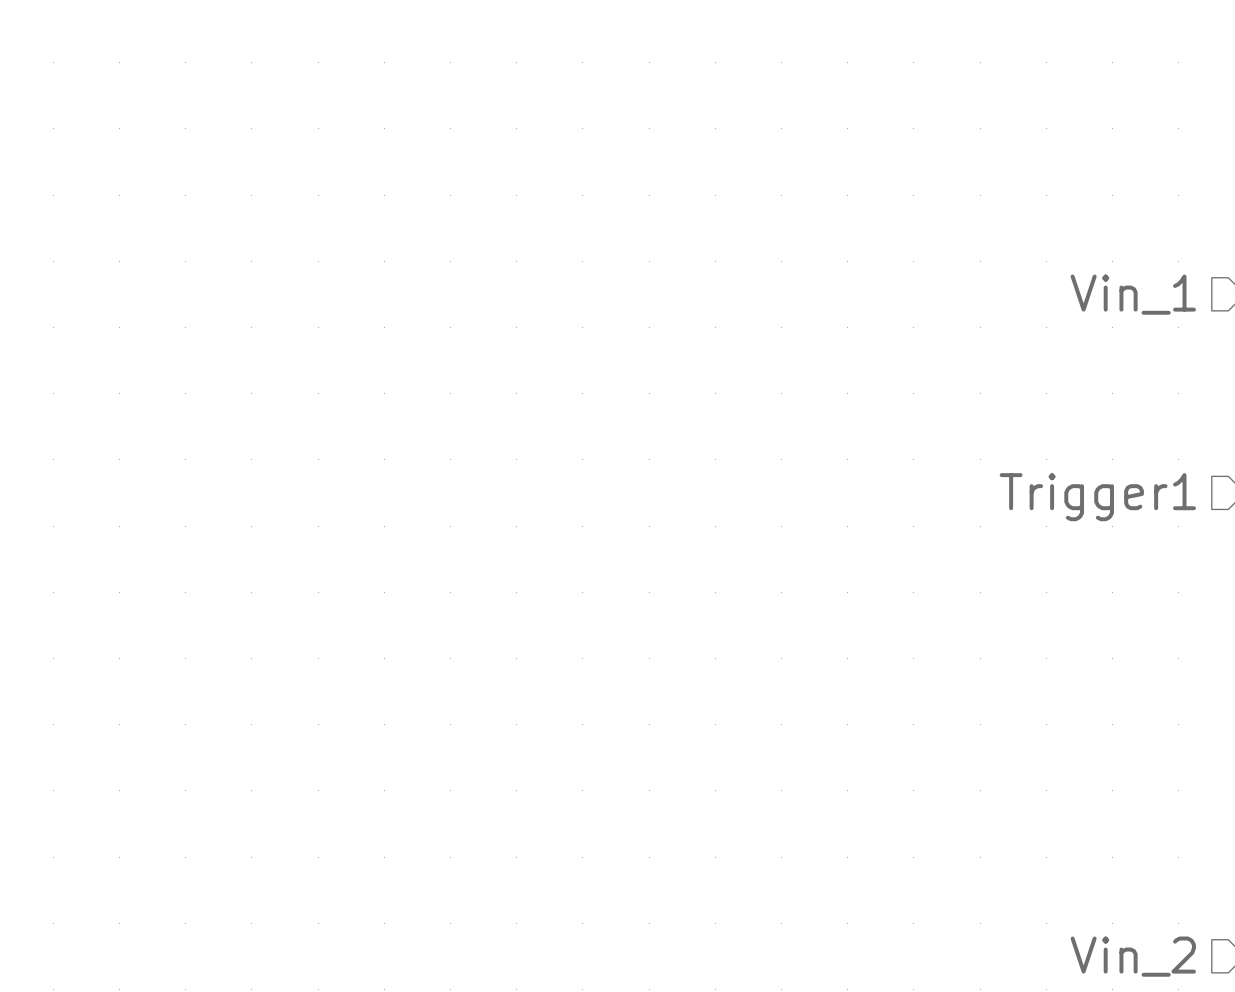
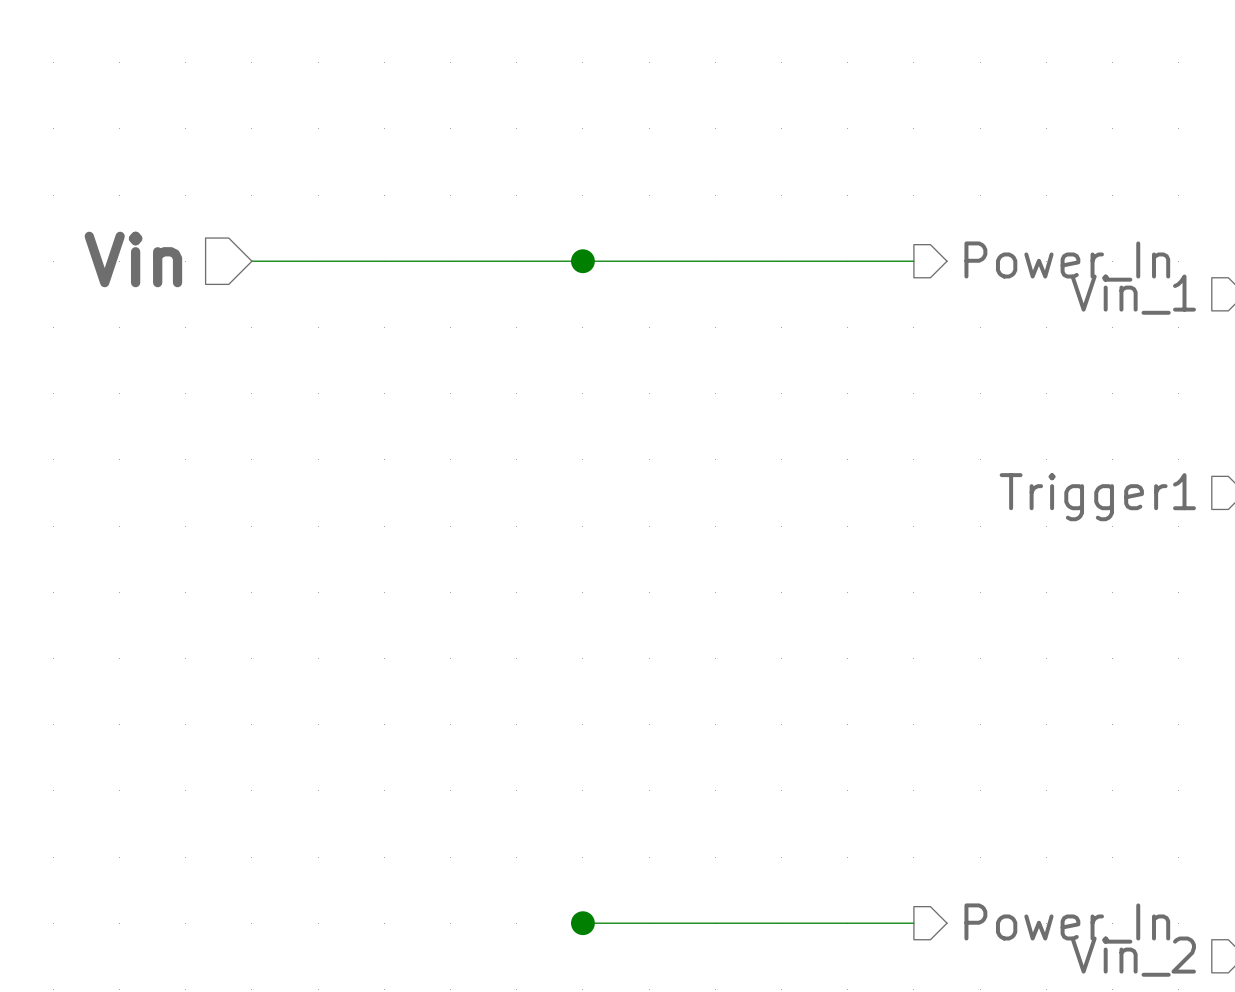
hierarchical label: none -> Vin (133, 259)
wire: none -> (251, 261) (913, 261)
junction: none -> (582, 261)
sheet pin: none -> Power_In (1067, 261)
wire: none -> (582, 923) (913, 923)
junction: none -> (582, 923)
sheet pin: none -> Power_In (1067, 923)

